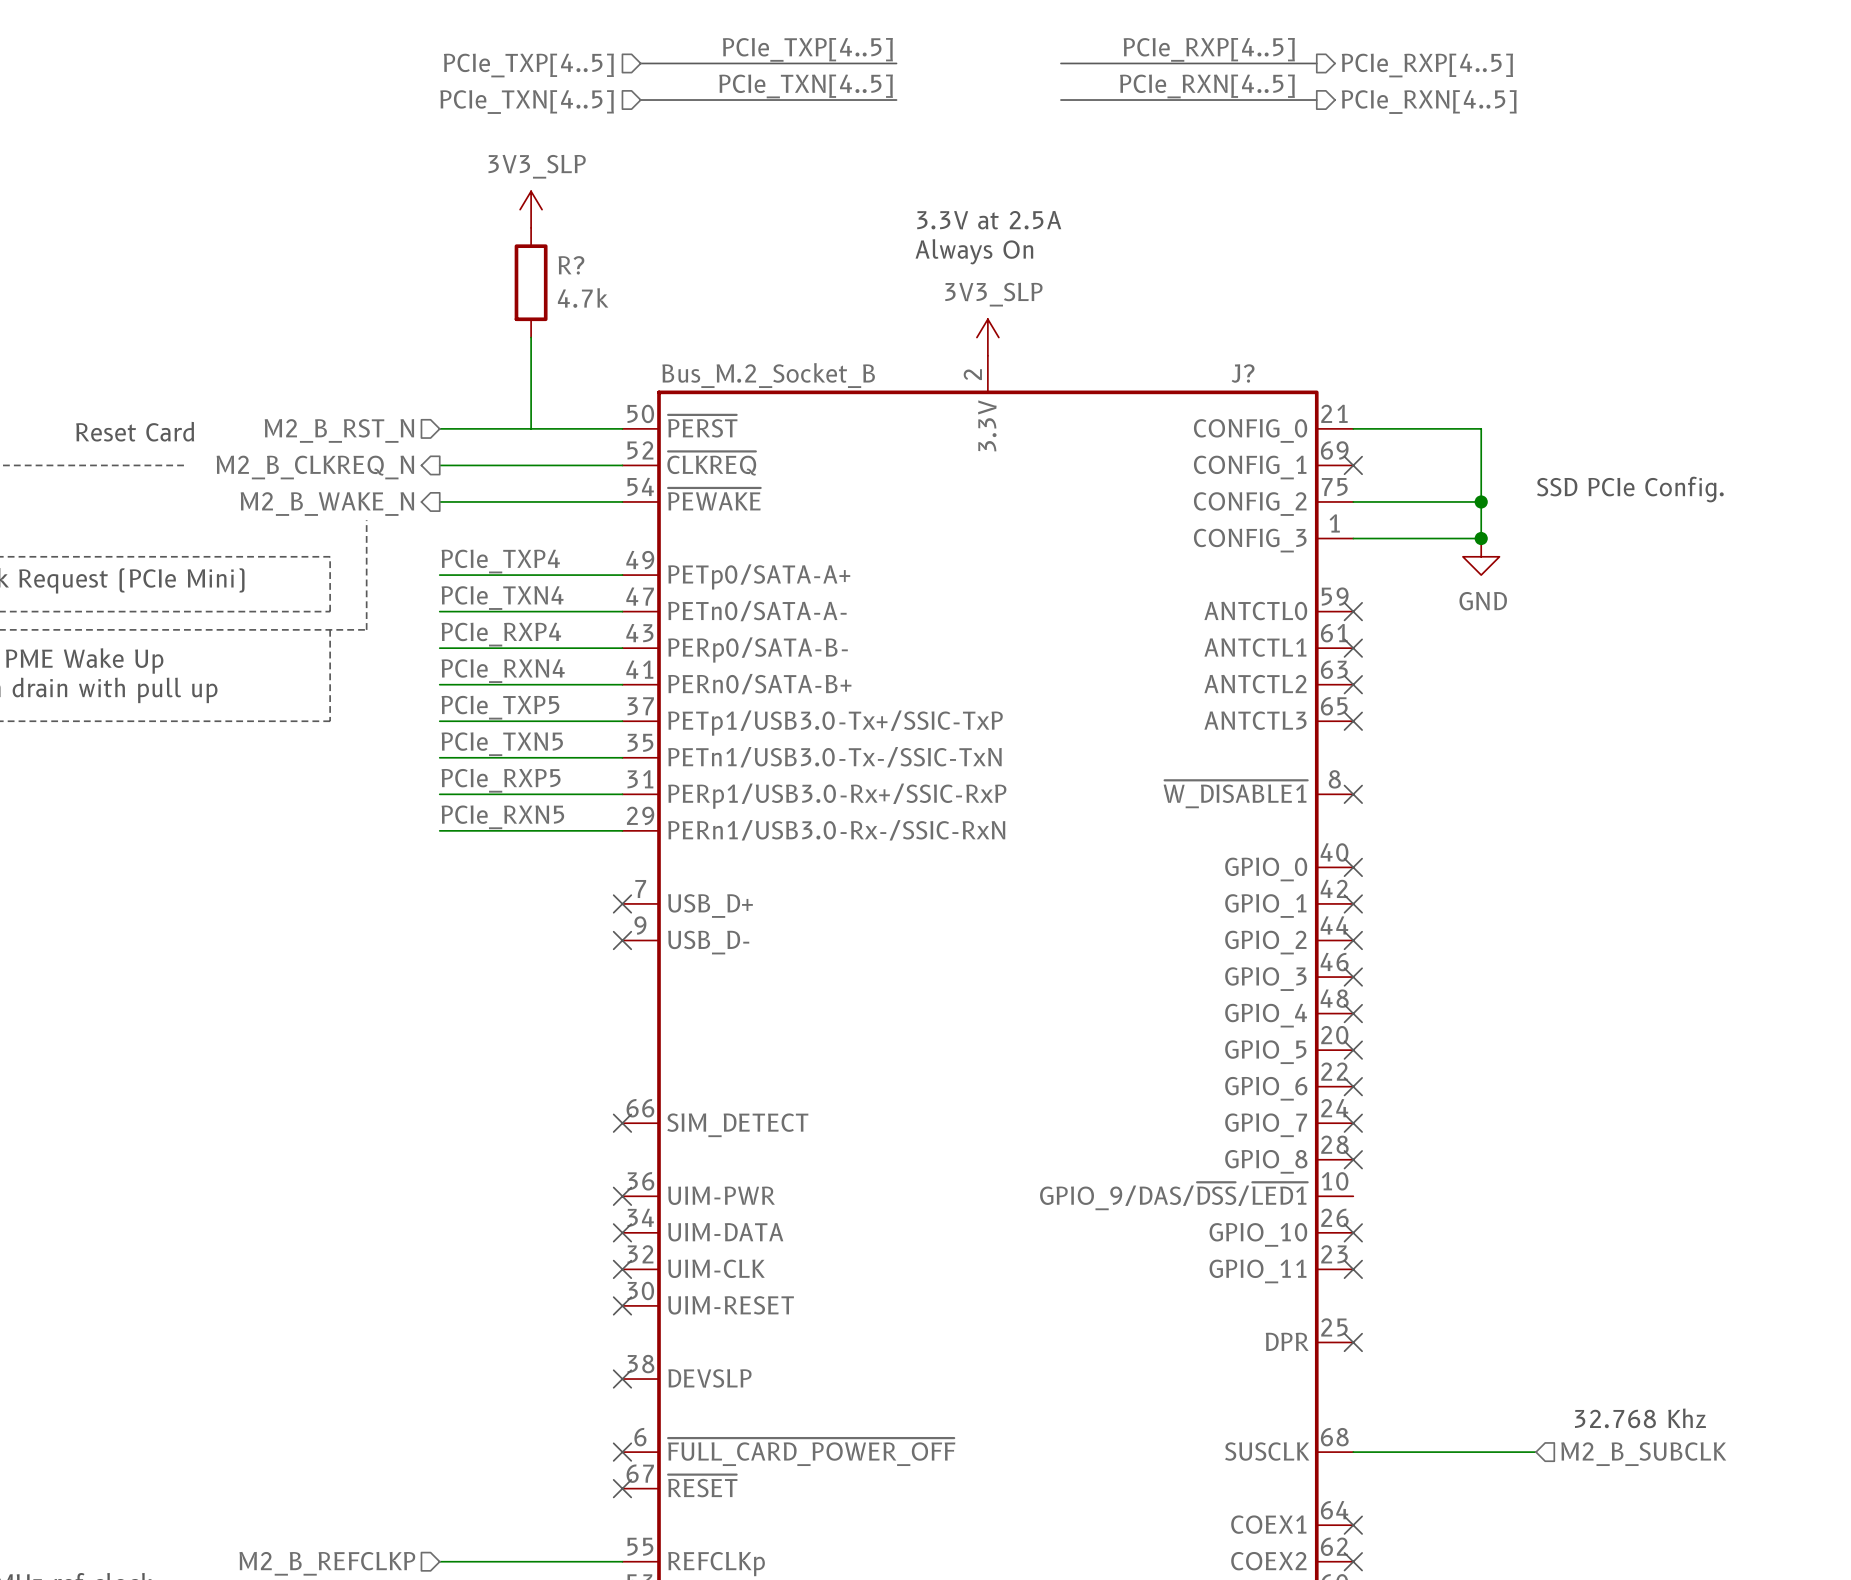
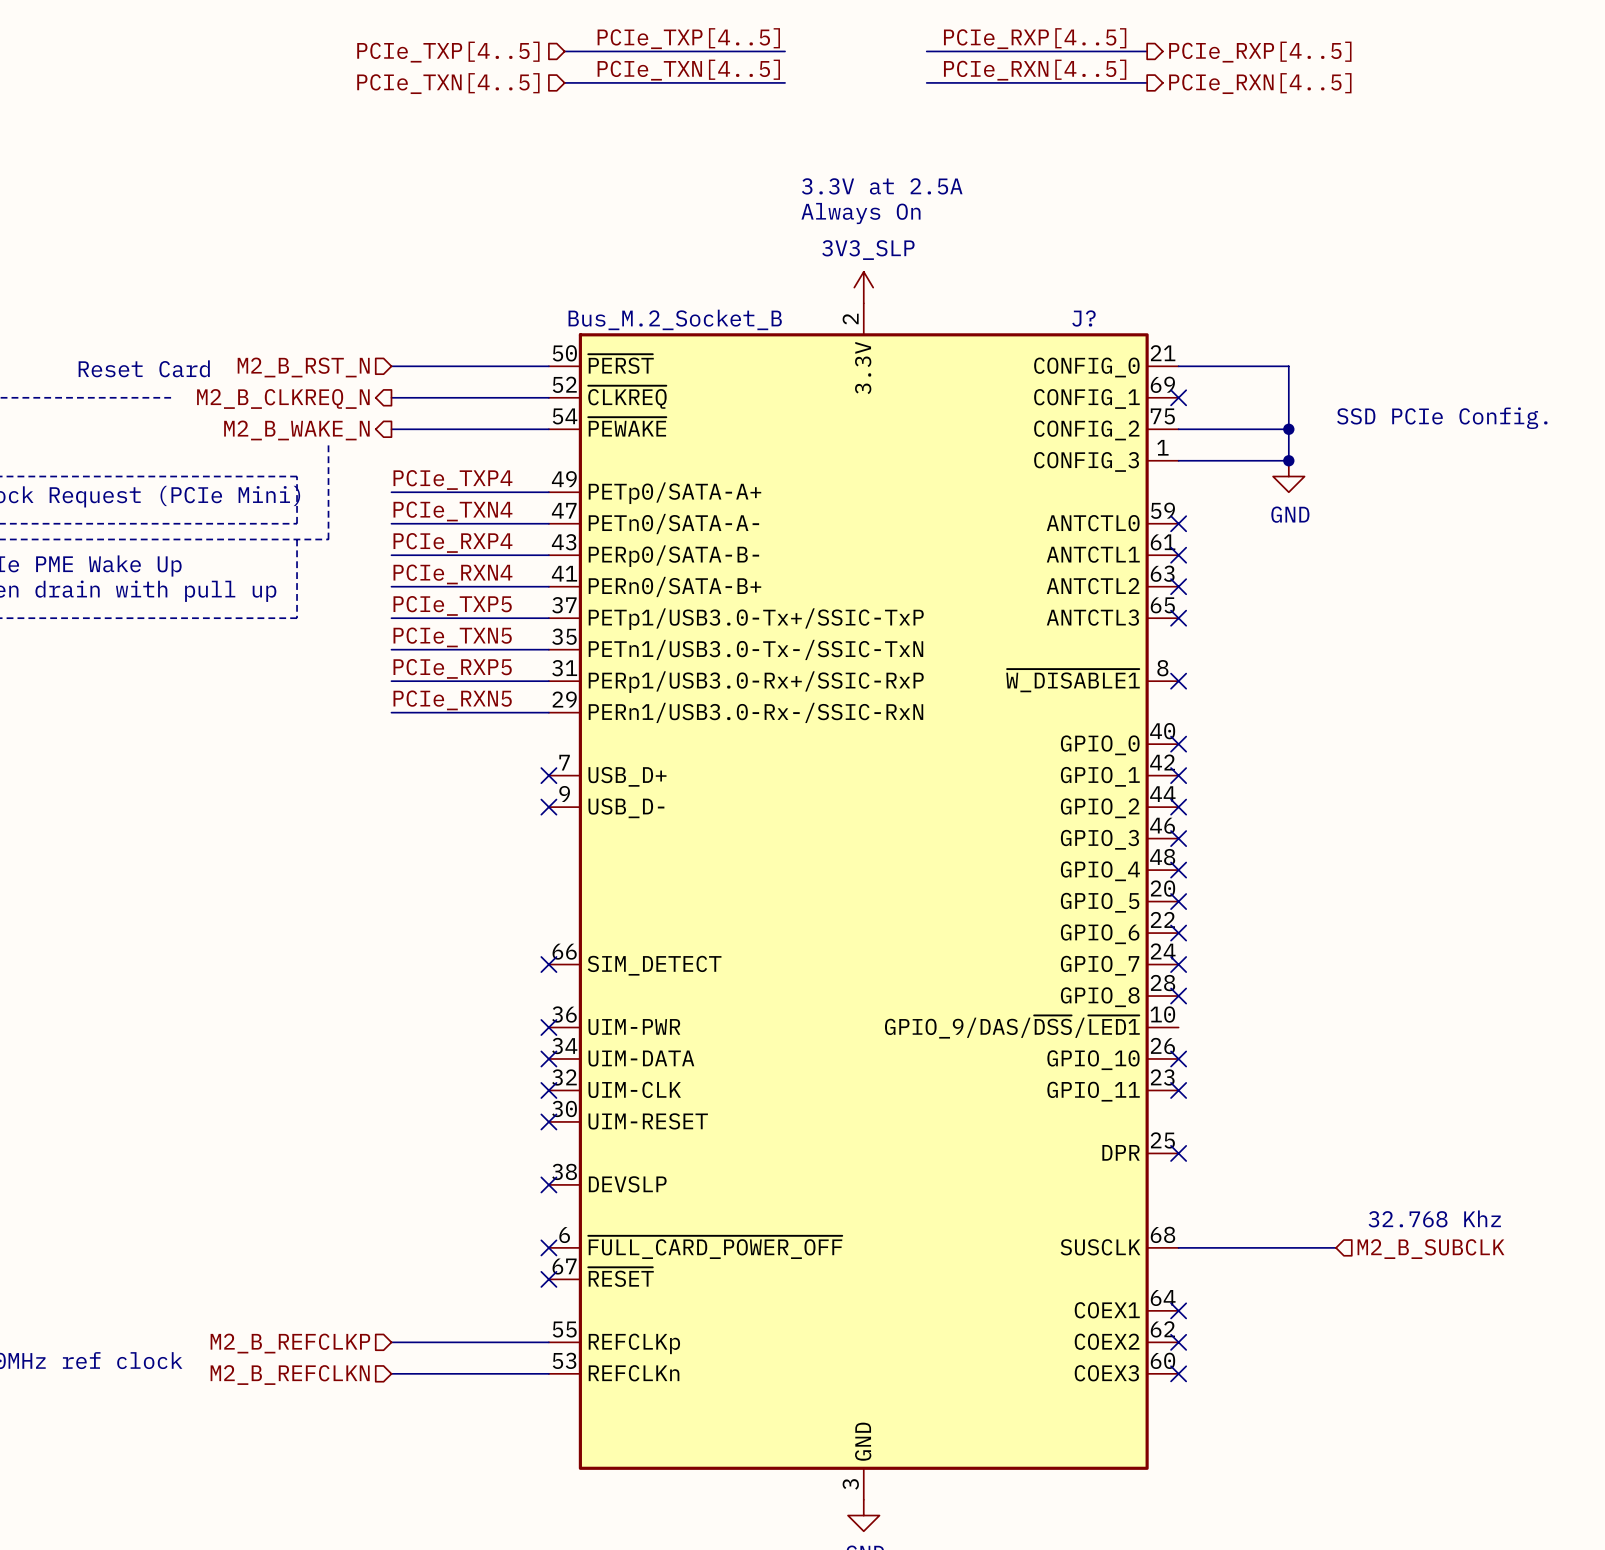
power symbol: 3V3_SLP (531, 209) -> none
R?: 4.7k (531, 282) -> none
wire: (531, 337) (531, 428) -> none

